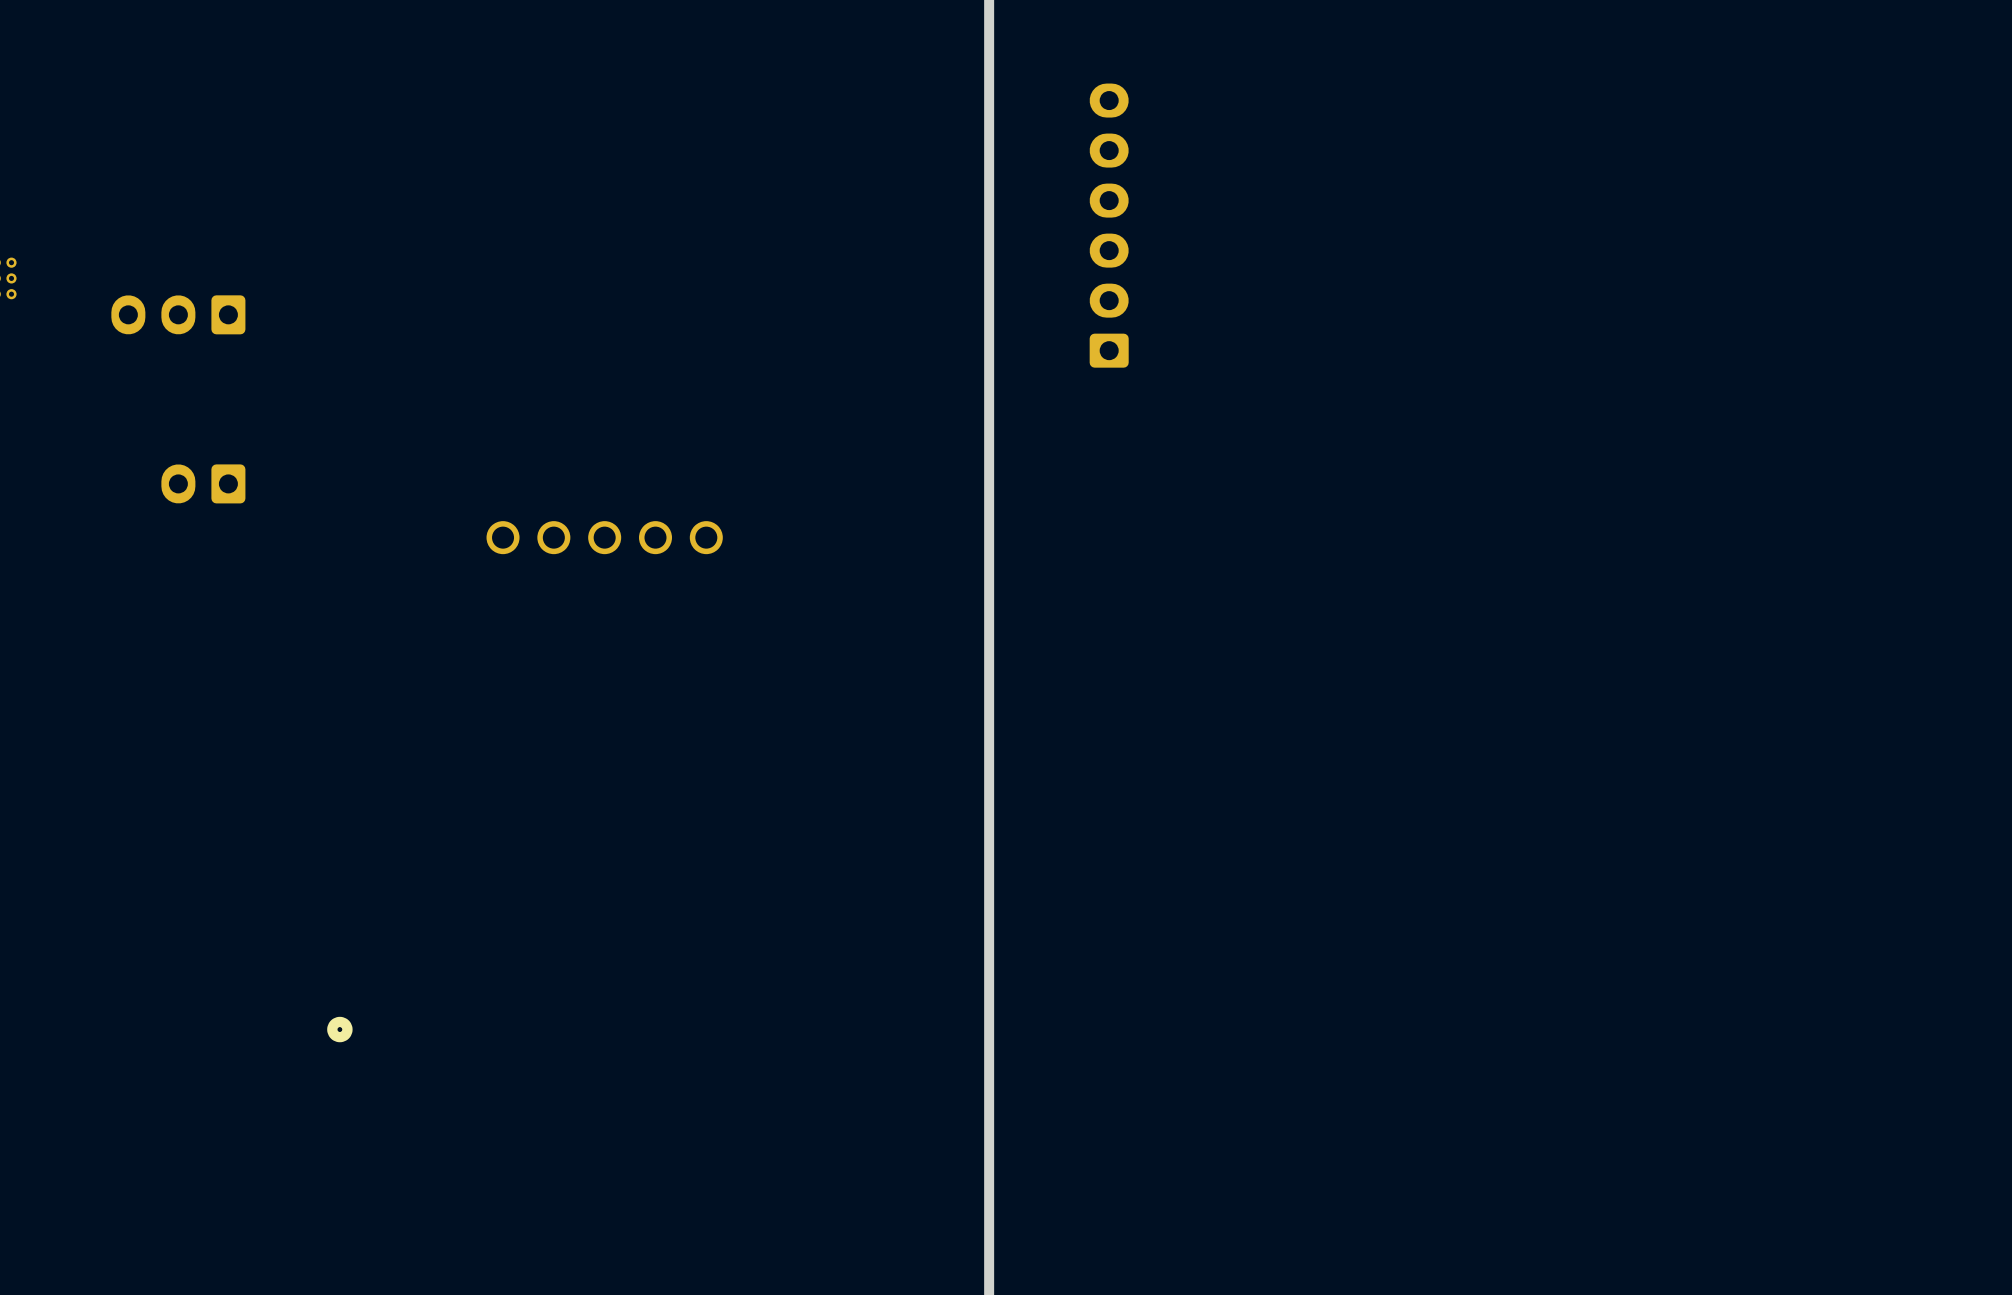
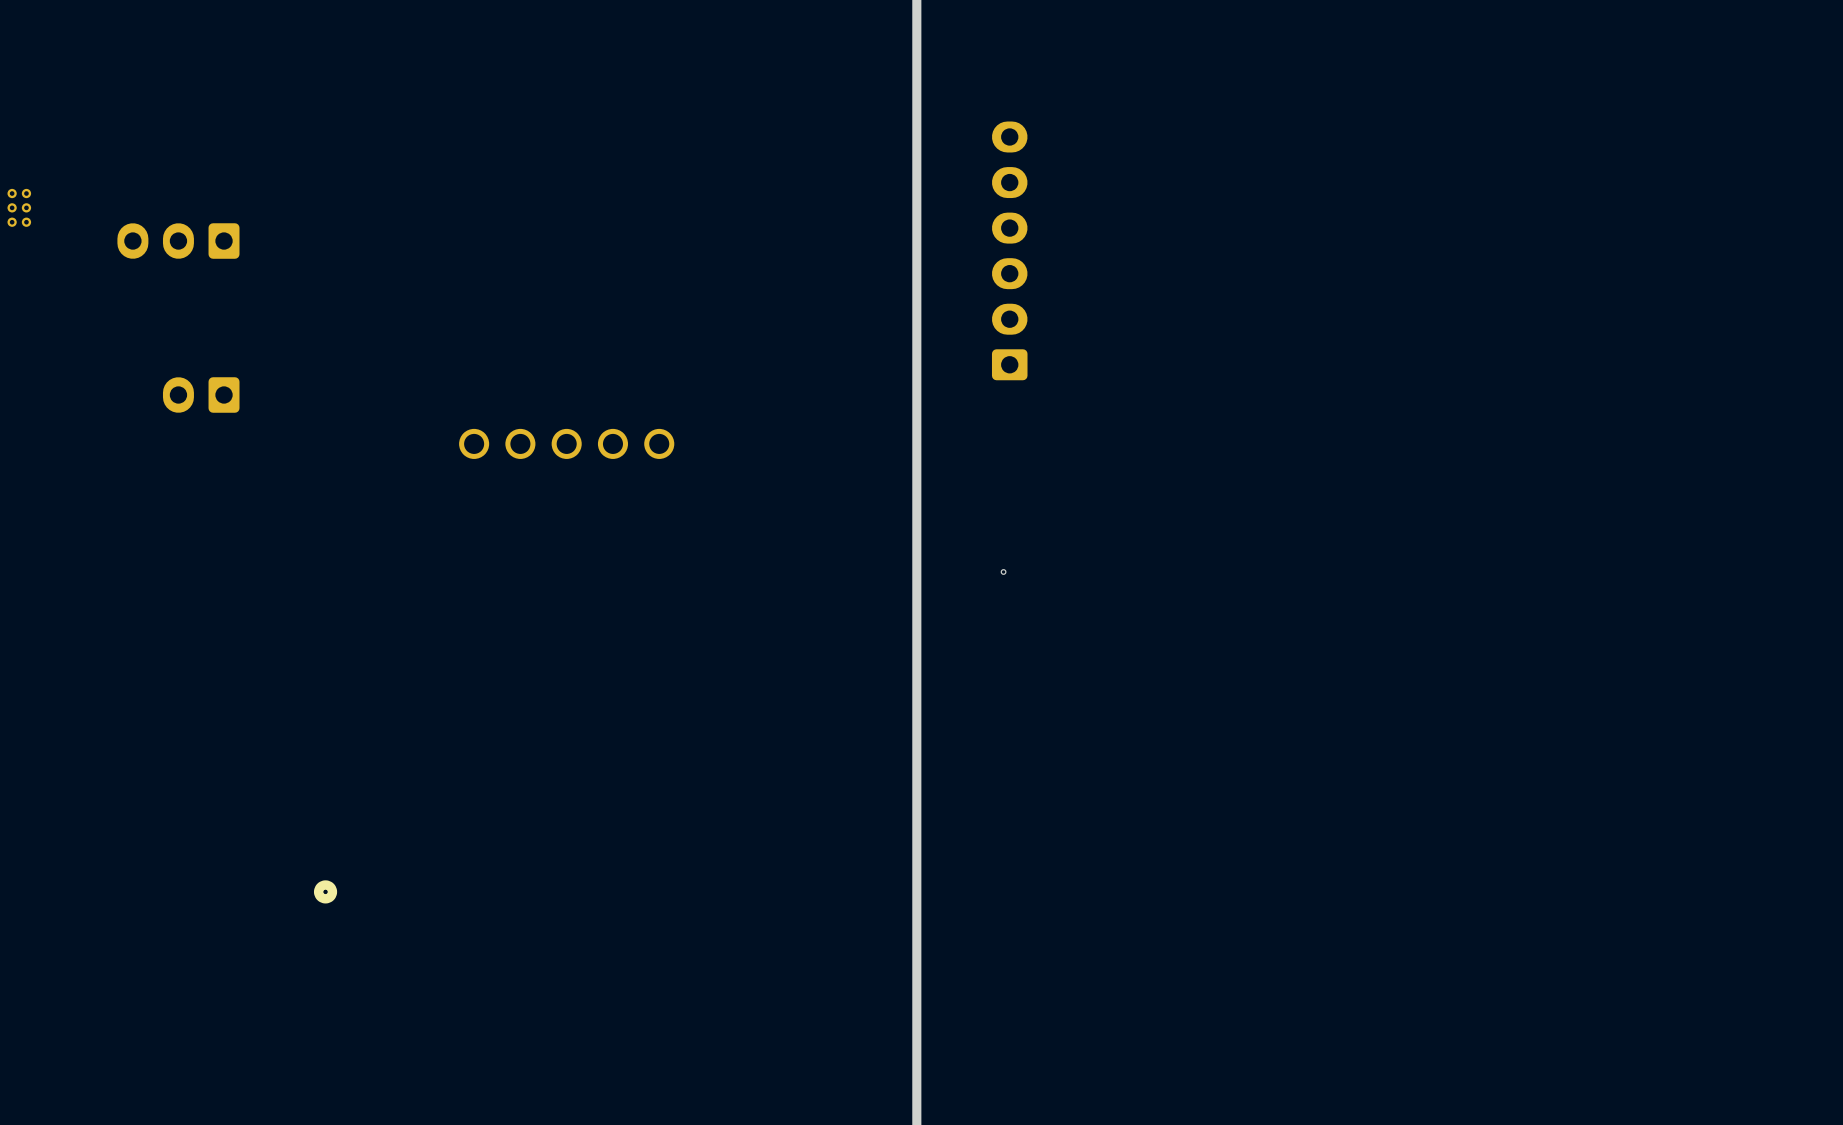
part position: (1109, 225) -> (1009, 250)
part: none -> (1003, 571)

